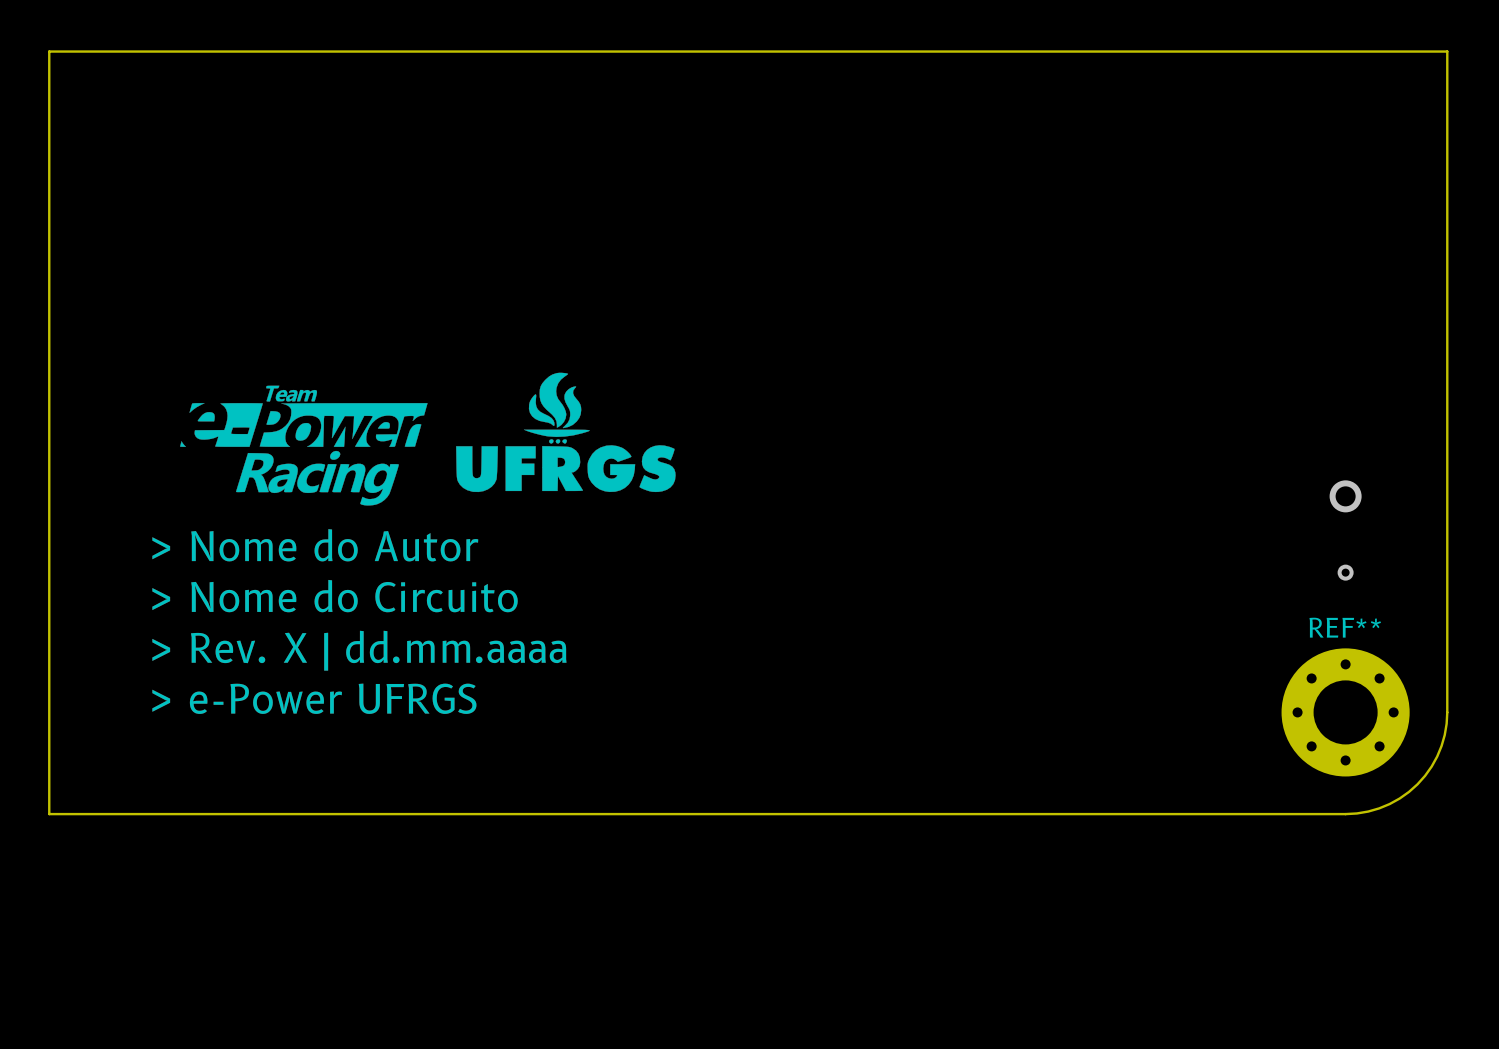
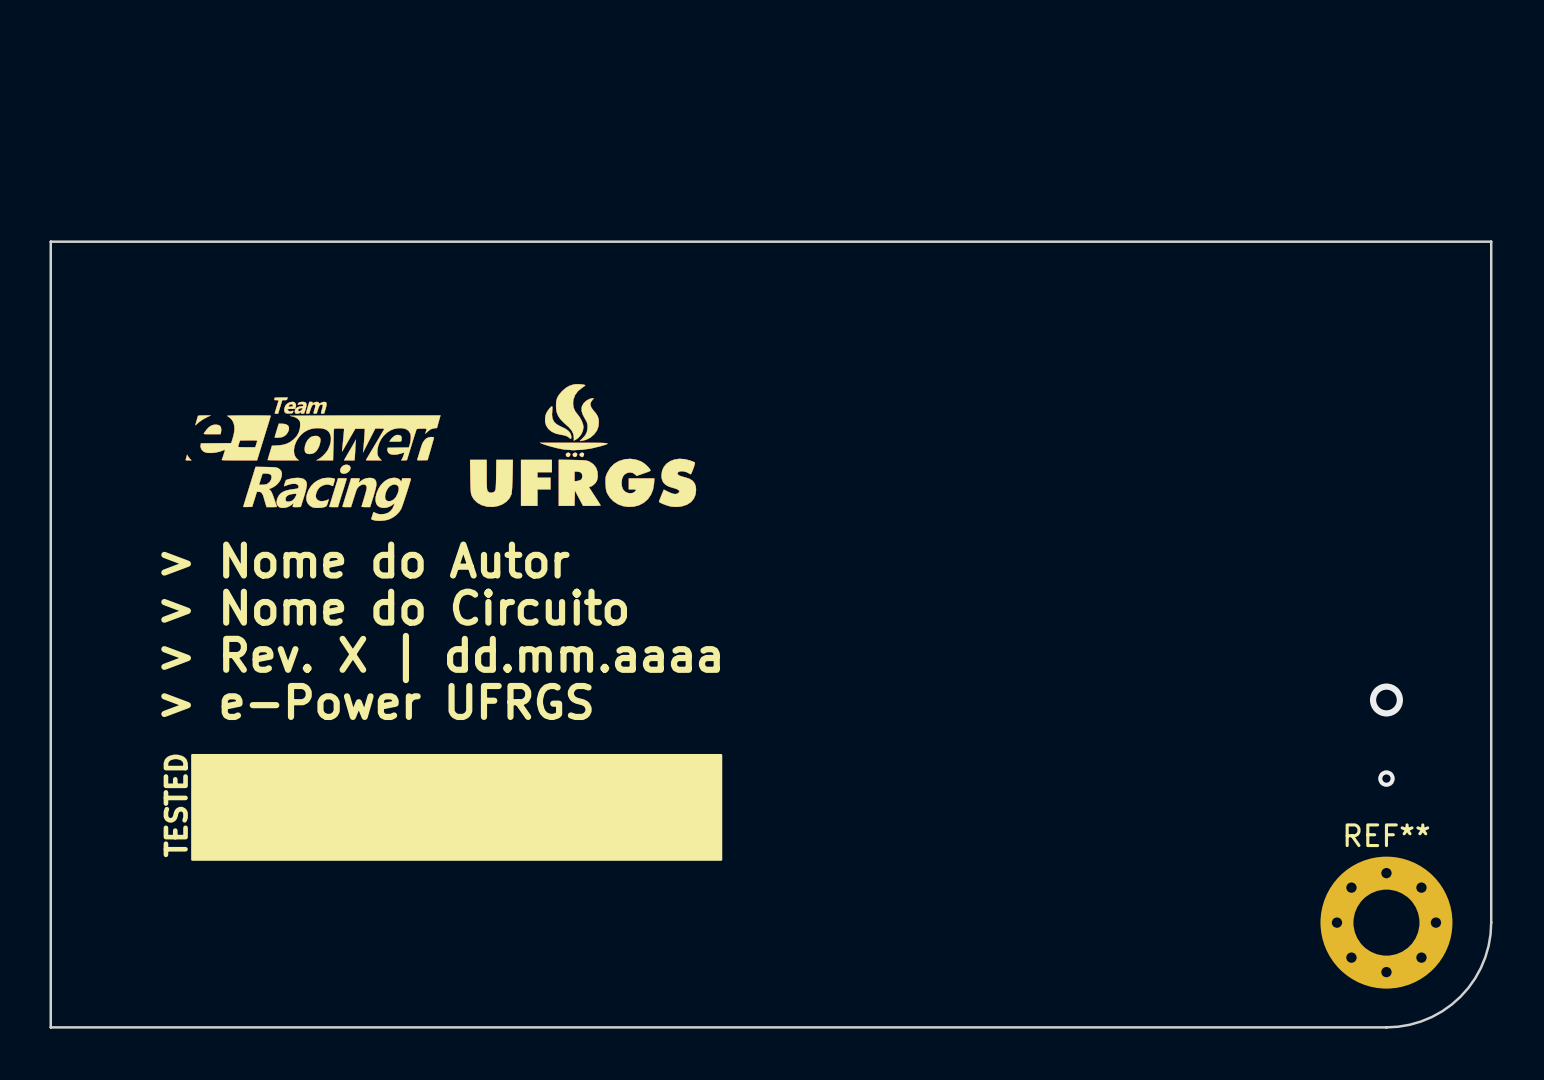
board edge: (49, 234) (49, 51) (1447, 51) (1447, 234) -> (50, 241) (1491, 241)
via: (1345, 496) -> none
text: none -> > Nome do Autor (365, 560)
text: > Nome do Autor (315, 545) -> none
via: (1345, 572) -> none
text: none -> > Nome do Circuito (394, 607)
text: > Nome do Circuito (335, 596) -> none
text: none -> > Rev. X | dd.mm.aaaa (440, 658)
text: > Rev. X | dd.mm.aaaa (359, 650) -> none
via: none -> (1386, 700)
text: none -> > e-Power UFRGS (376, 701)
text: > e-Power UFRGS (314, 698) -> none
REF** position: (1345, 712) -> (1386, 922)
board edge: (1447, 712) (1444, 735) (1437, 756) (1417, 784) (1389, 804) (1356, 813) (49, 814) -> (1491, 734) (1491, 922) (1485, 957) (1475, 978) (1451, 1004) (1431, 1017) (1398, 1026) (50, 1027) (50, 838)
drawing: none -> [191, 753, 723, 861]
via: none -> (1386, 778)
text: none -> TESTED (175, 805)

